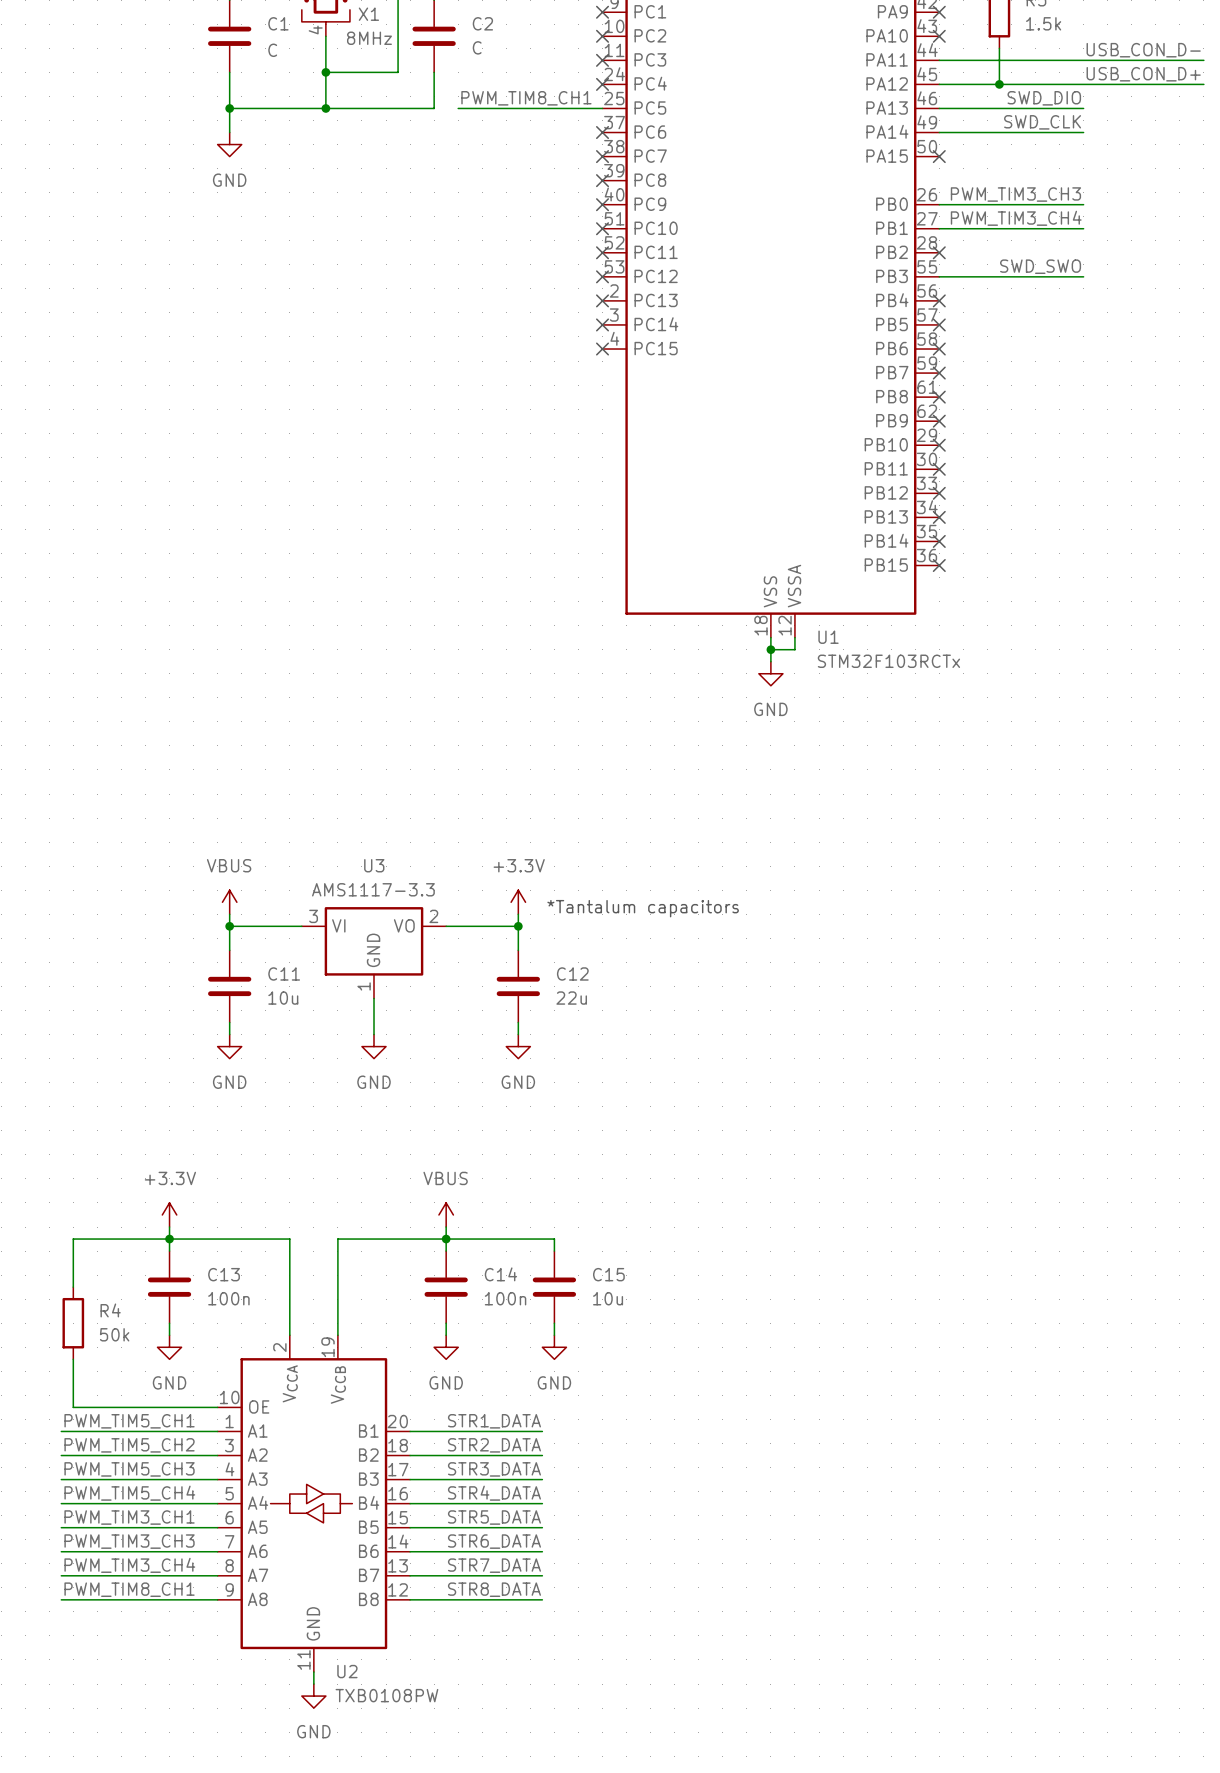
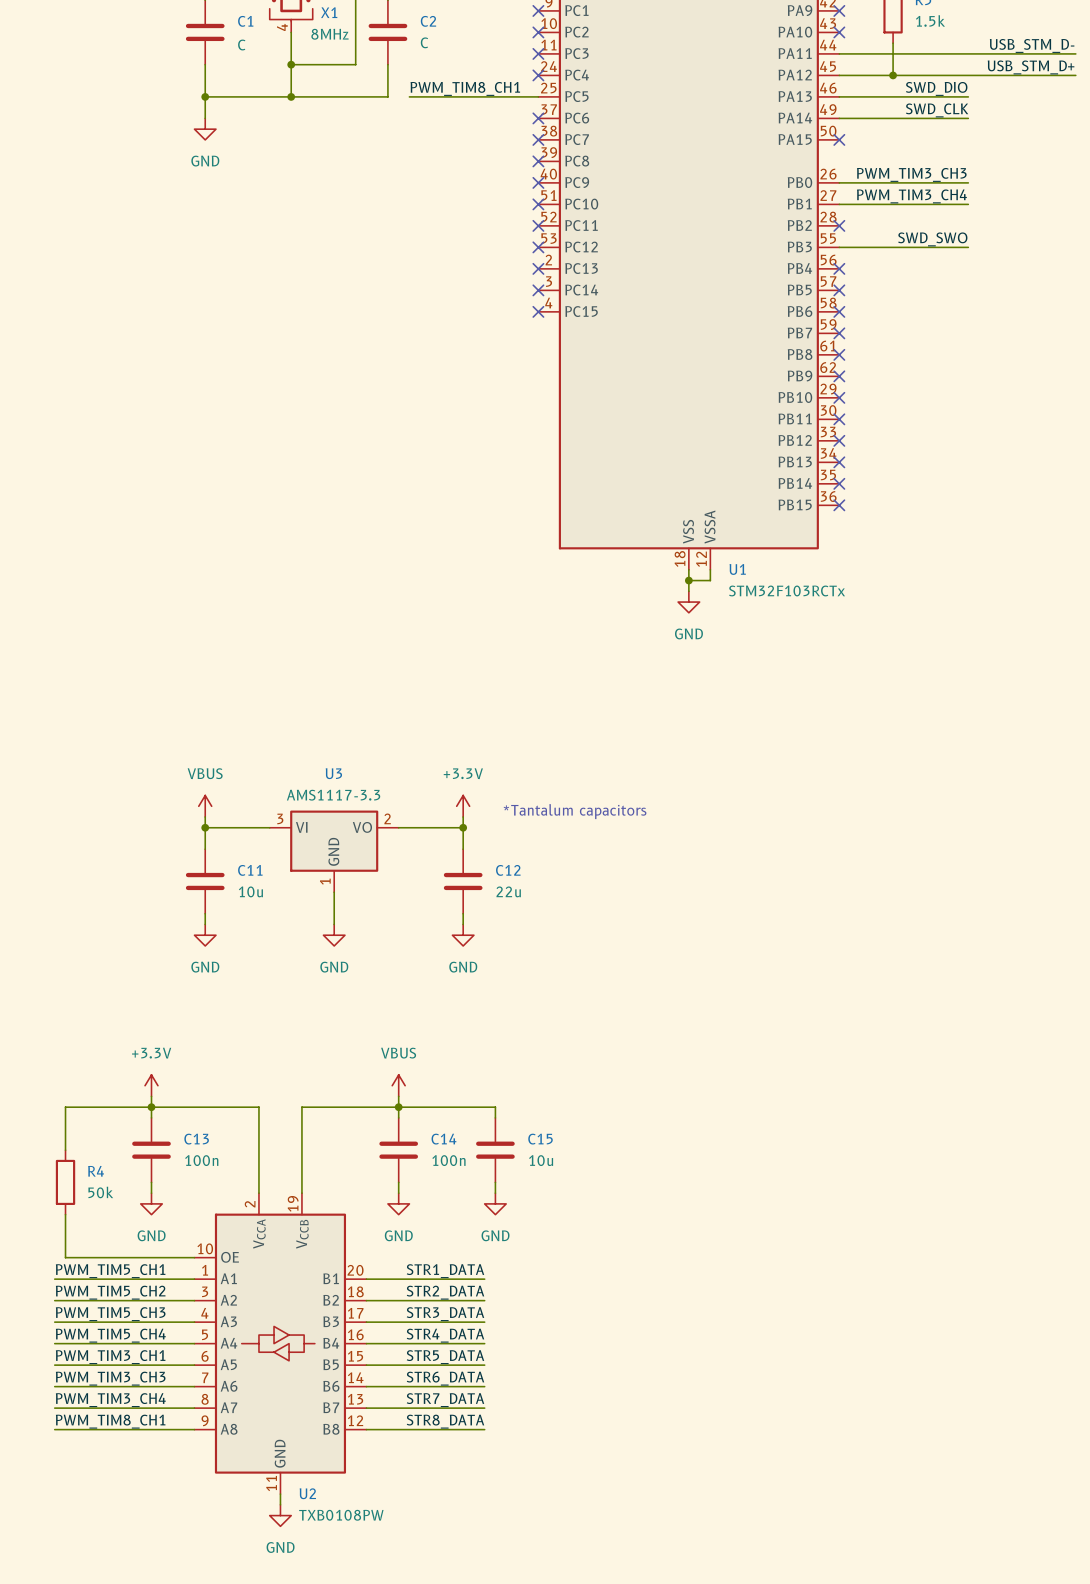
label: USB_CON_D- (1143, 50) -> USB_STM_D- (1032, 45)
label: USB_CON_D+ (1143, 74) -> USB_STM_D+ (1031, 67)

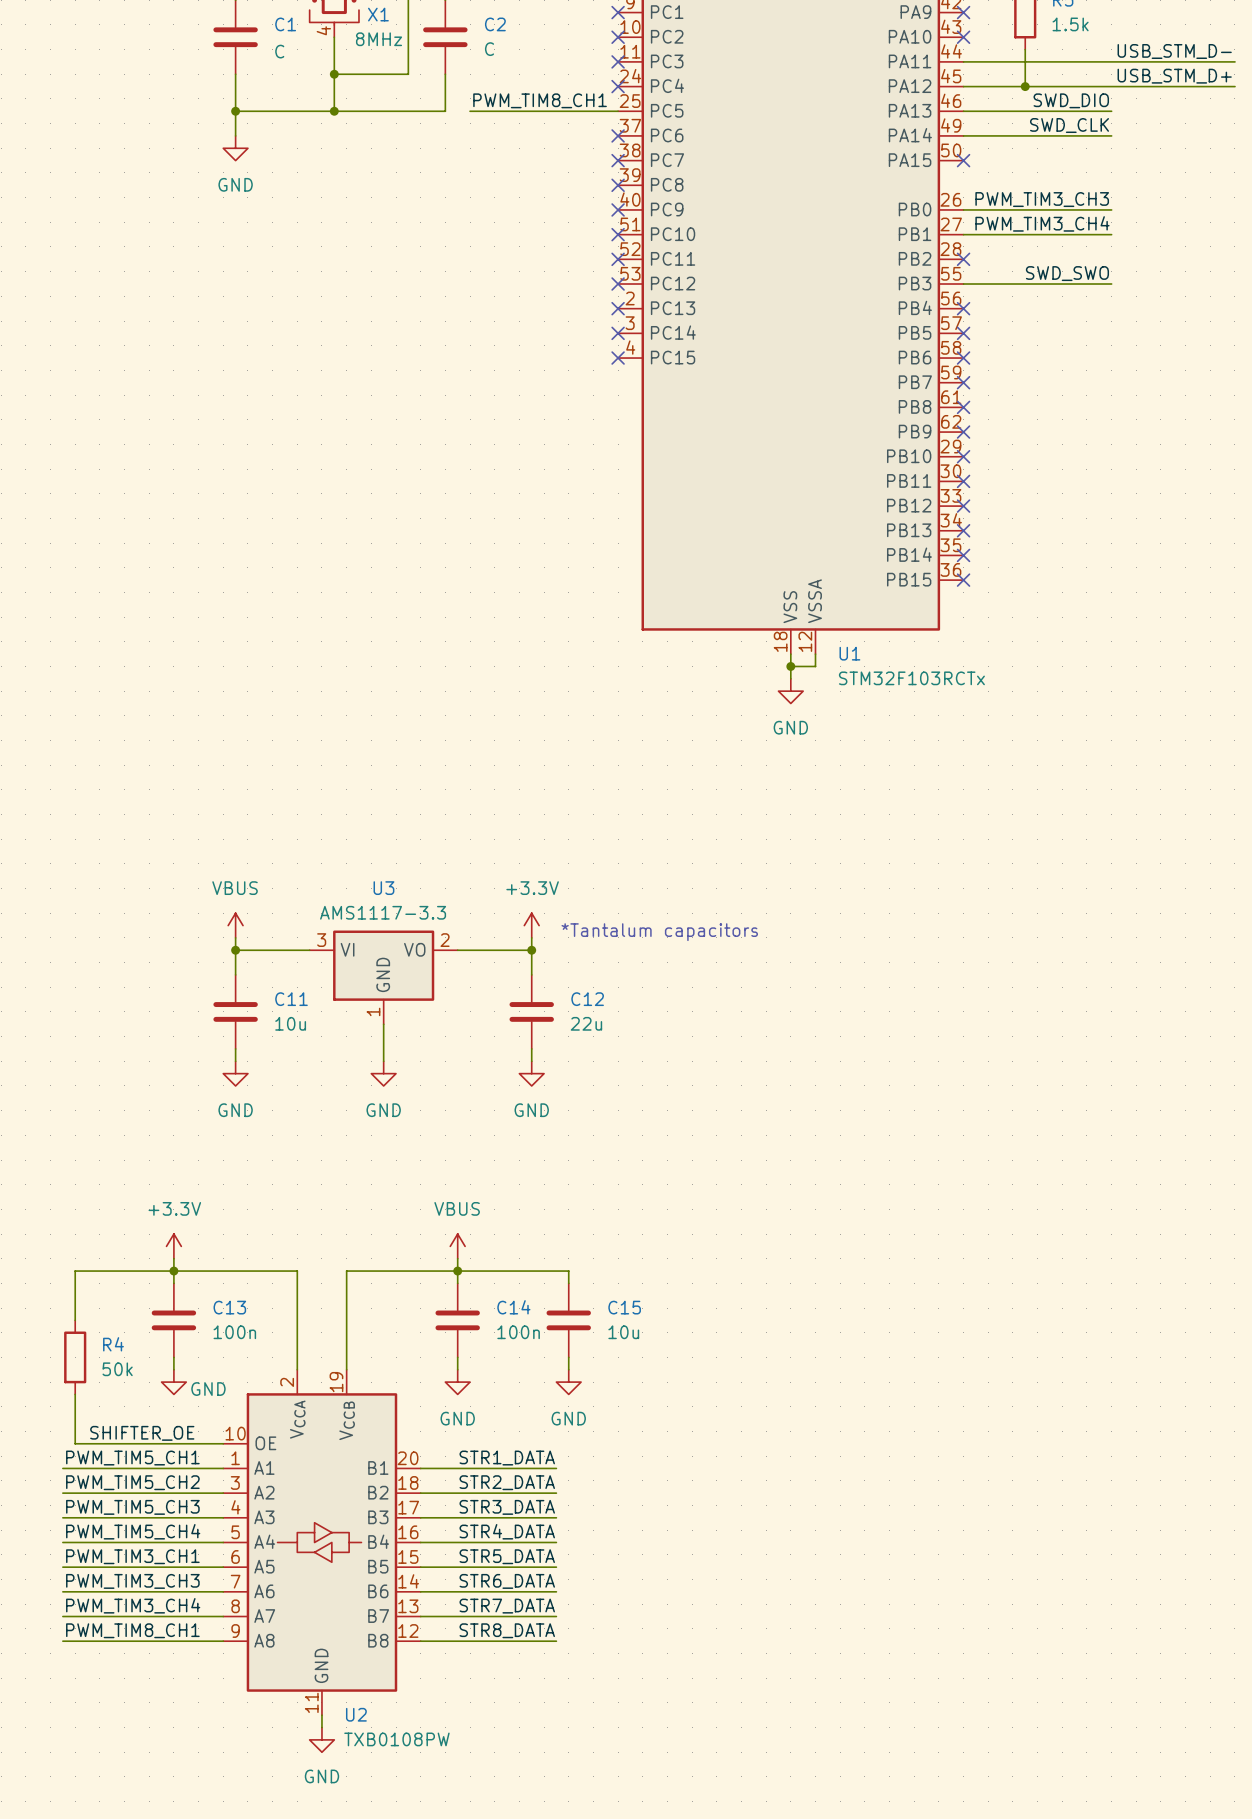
power symbol text position: GND (151, 1235) -> GND (208, 1389)
label: none -> SHIFTER_OE (142, 1433)

